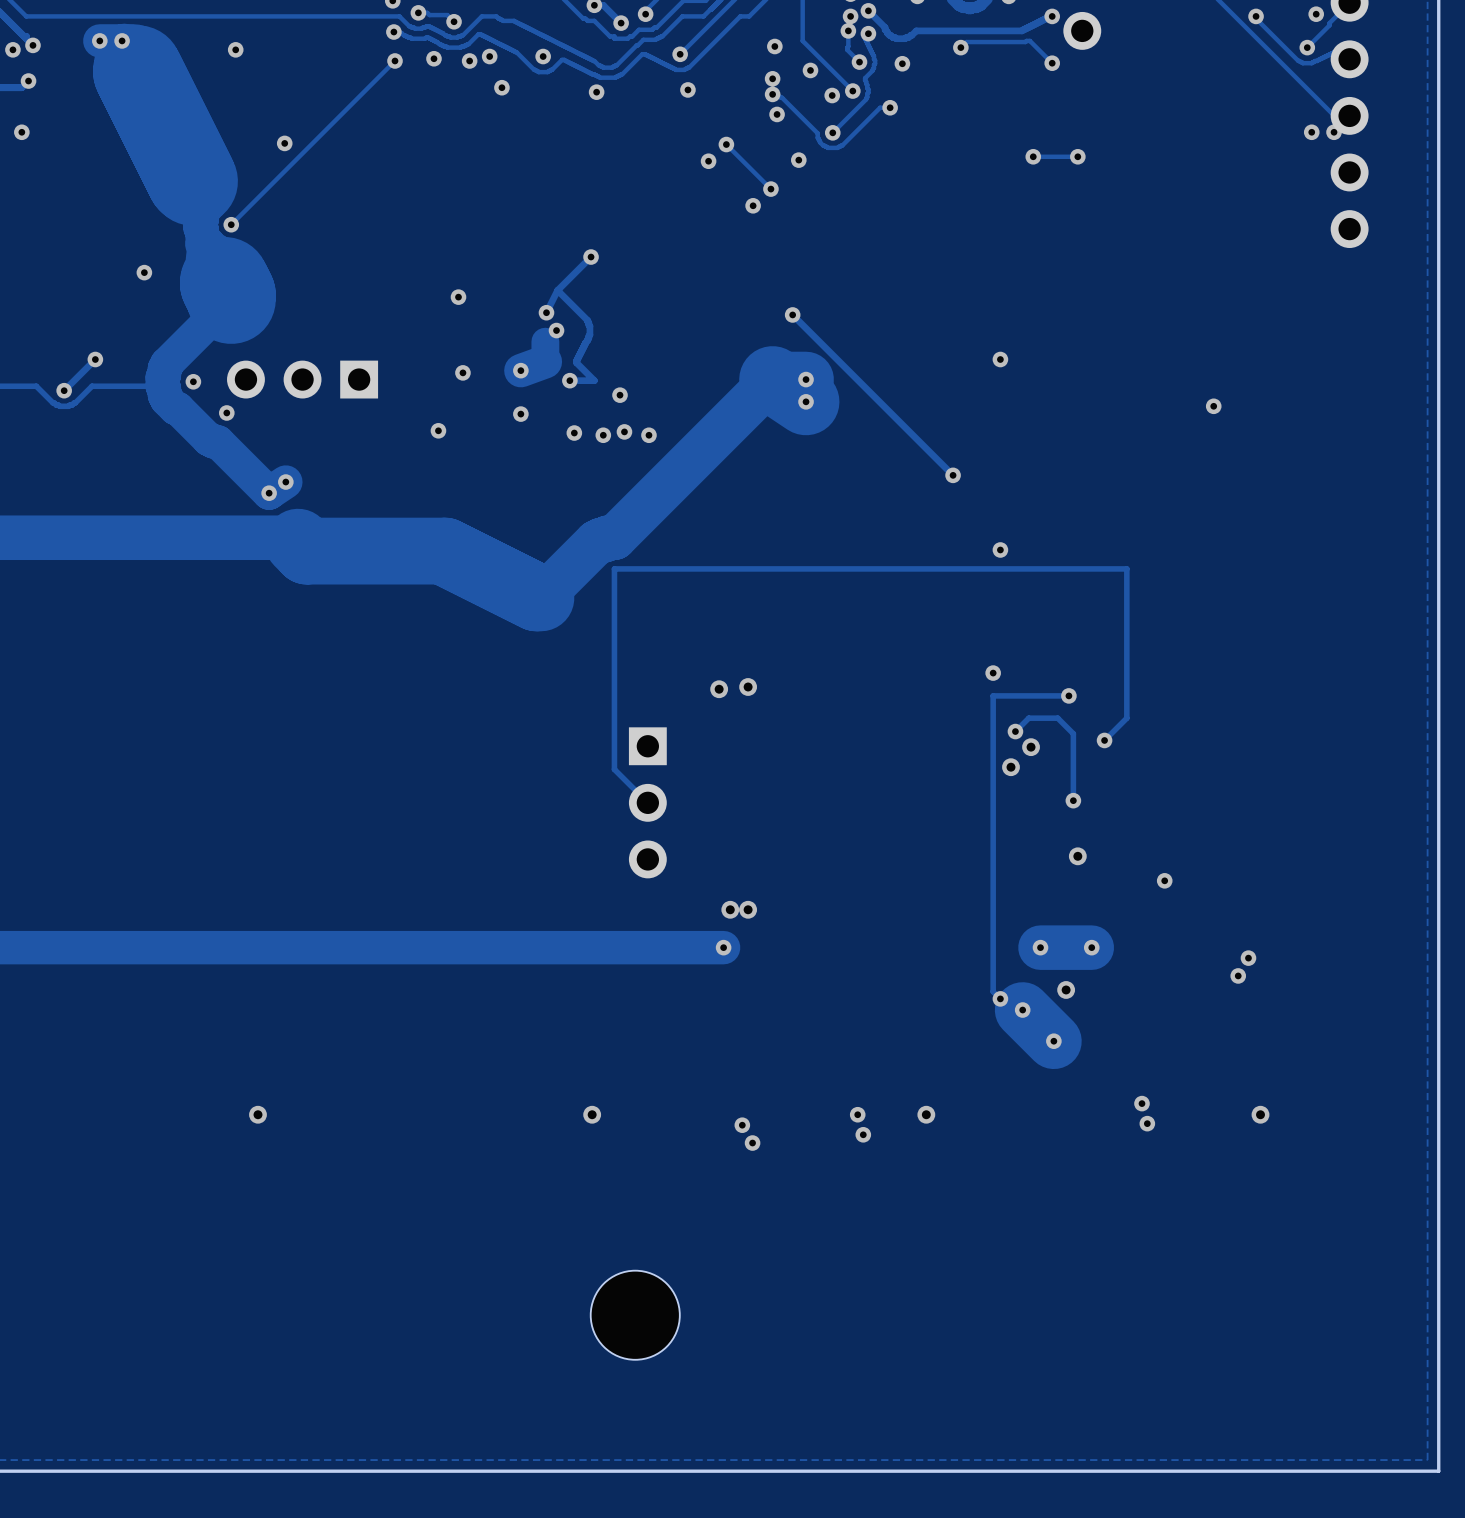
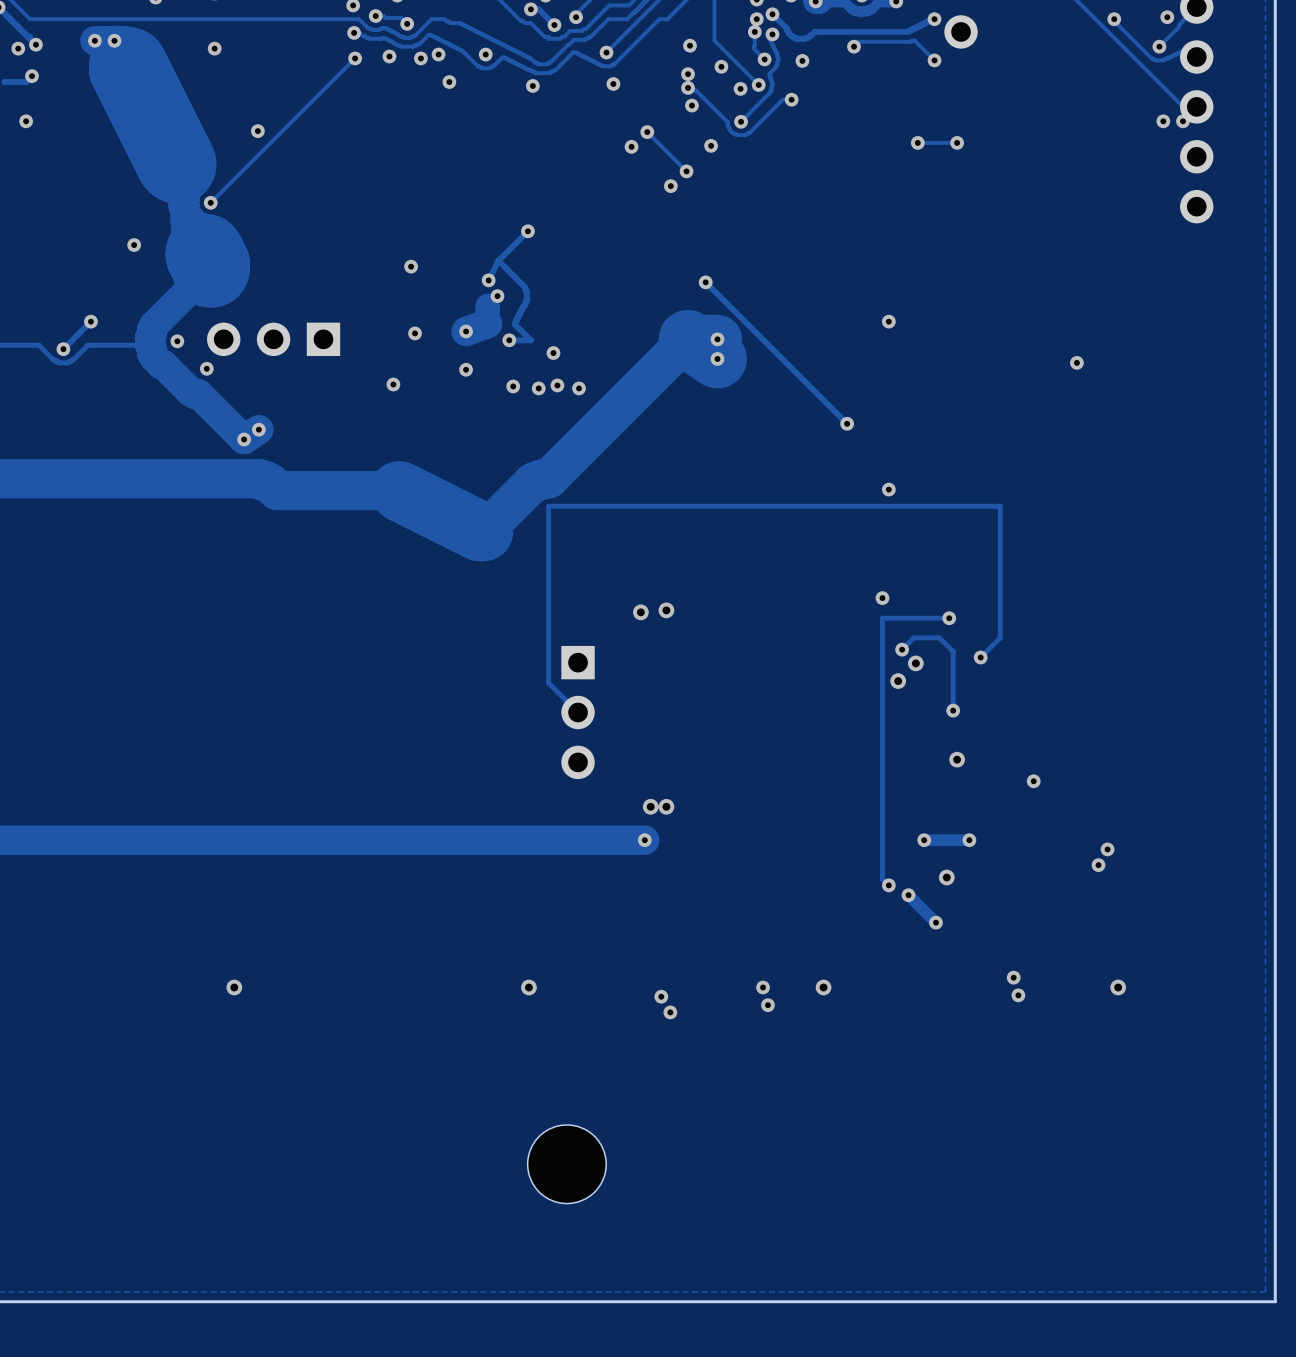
track width: thick (293, 539) (307, 551) (445, 551) -> thin (265, 480) (277, 490) (399, 490)
track width: thick (1091, 947) (1040, 947) -> thin (969, 840) (924, 840)
track width: thick (1022, 1010) (1053, 1041) -> thin (908, 895) (936, 922)

